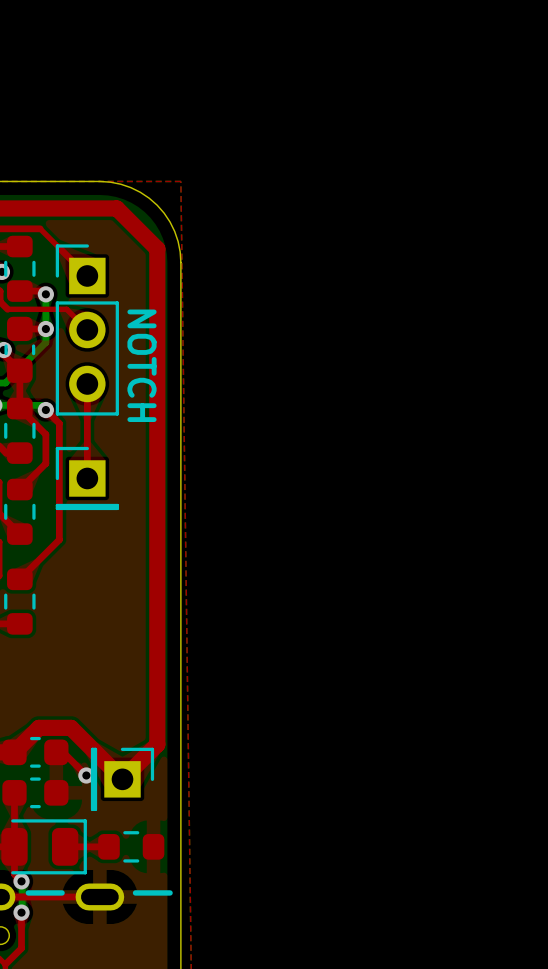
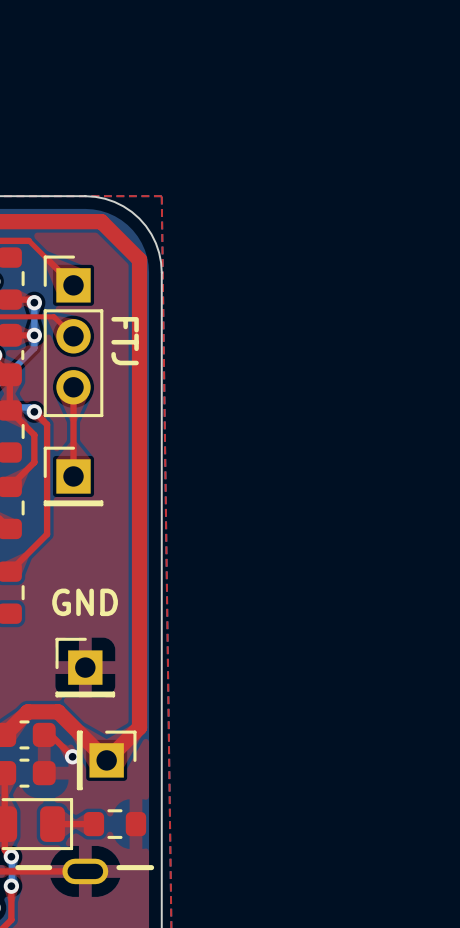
text: NOTCH (142, 365) -> FTJ (125, 341)
text: none -> GND (85, 602)
part: none -> (85, 667)

